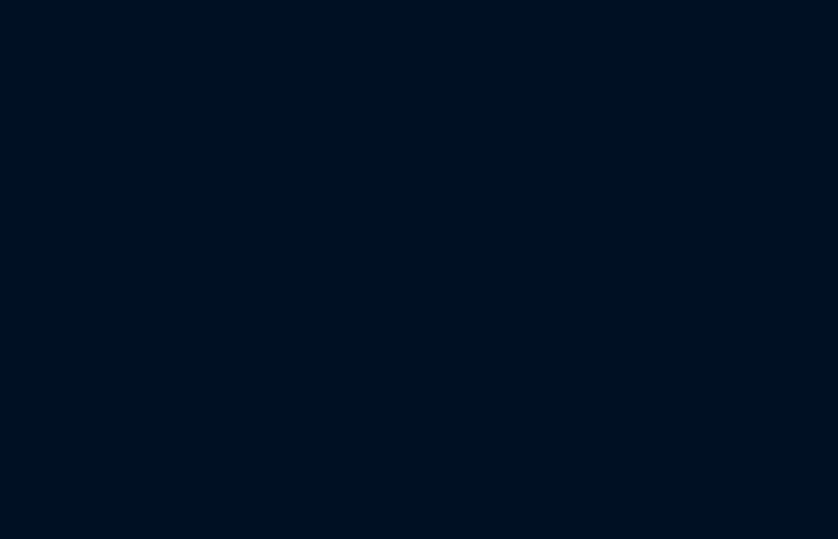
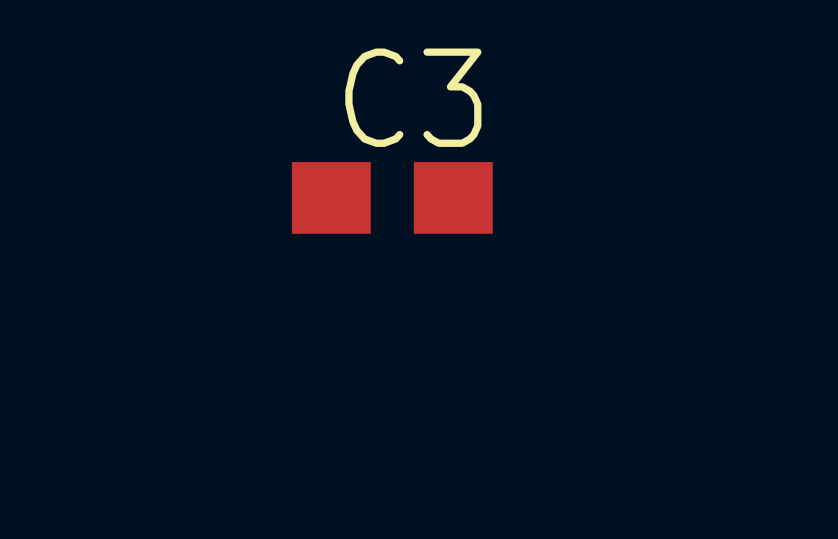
C3: none -> (392, 197)

